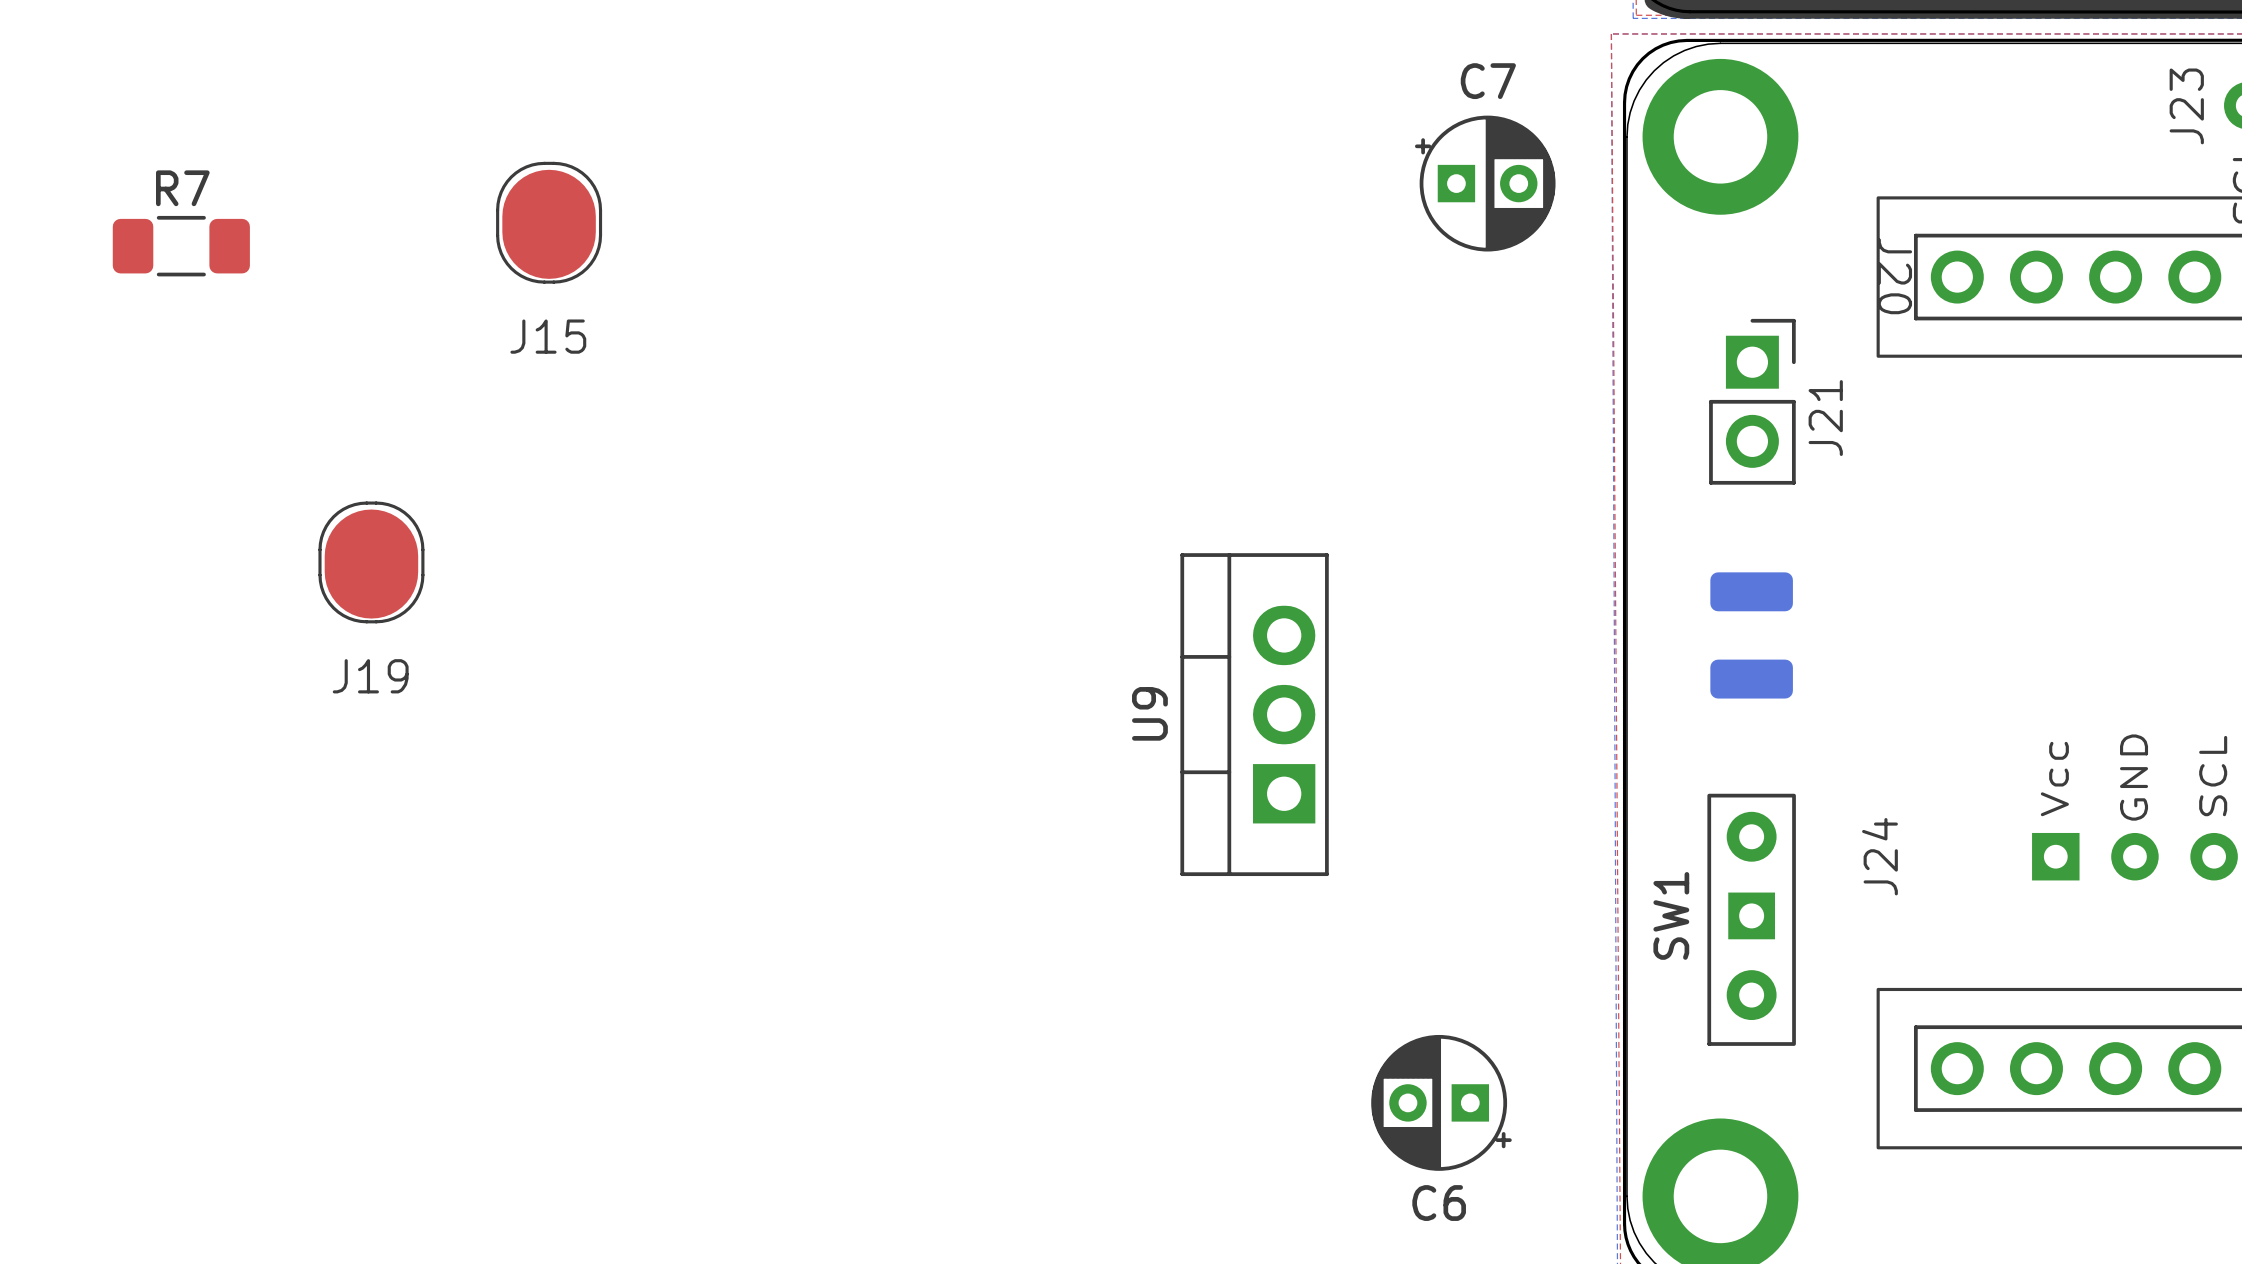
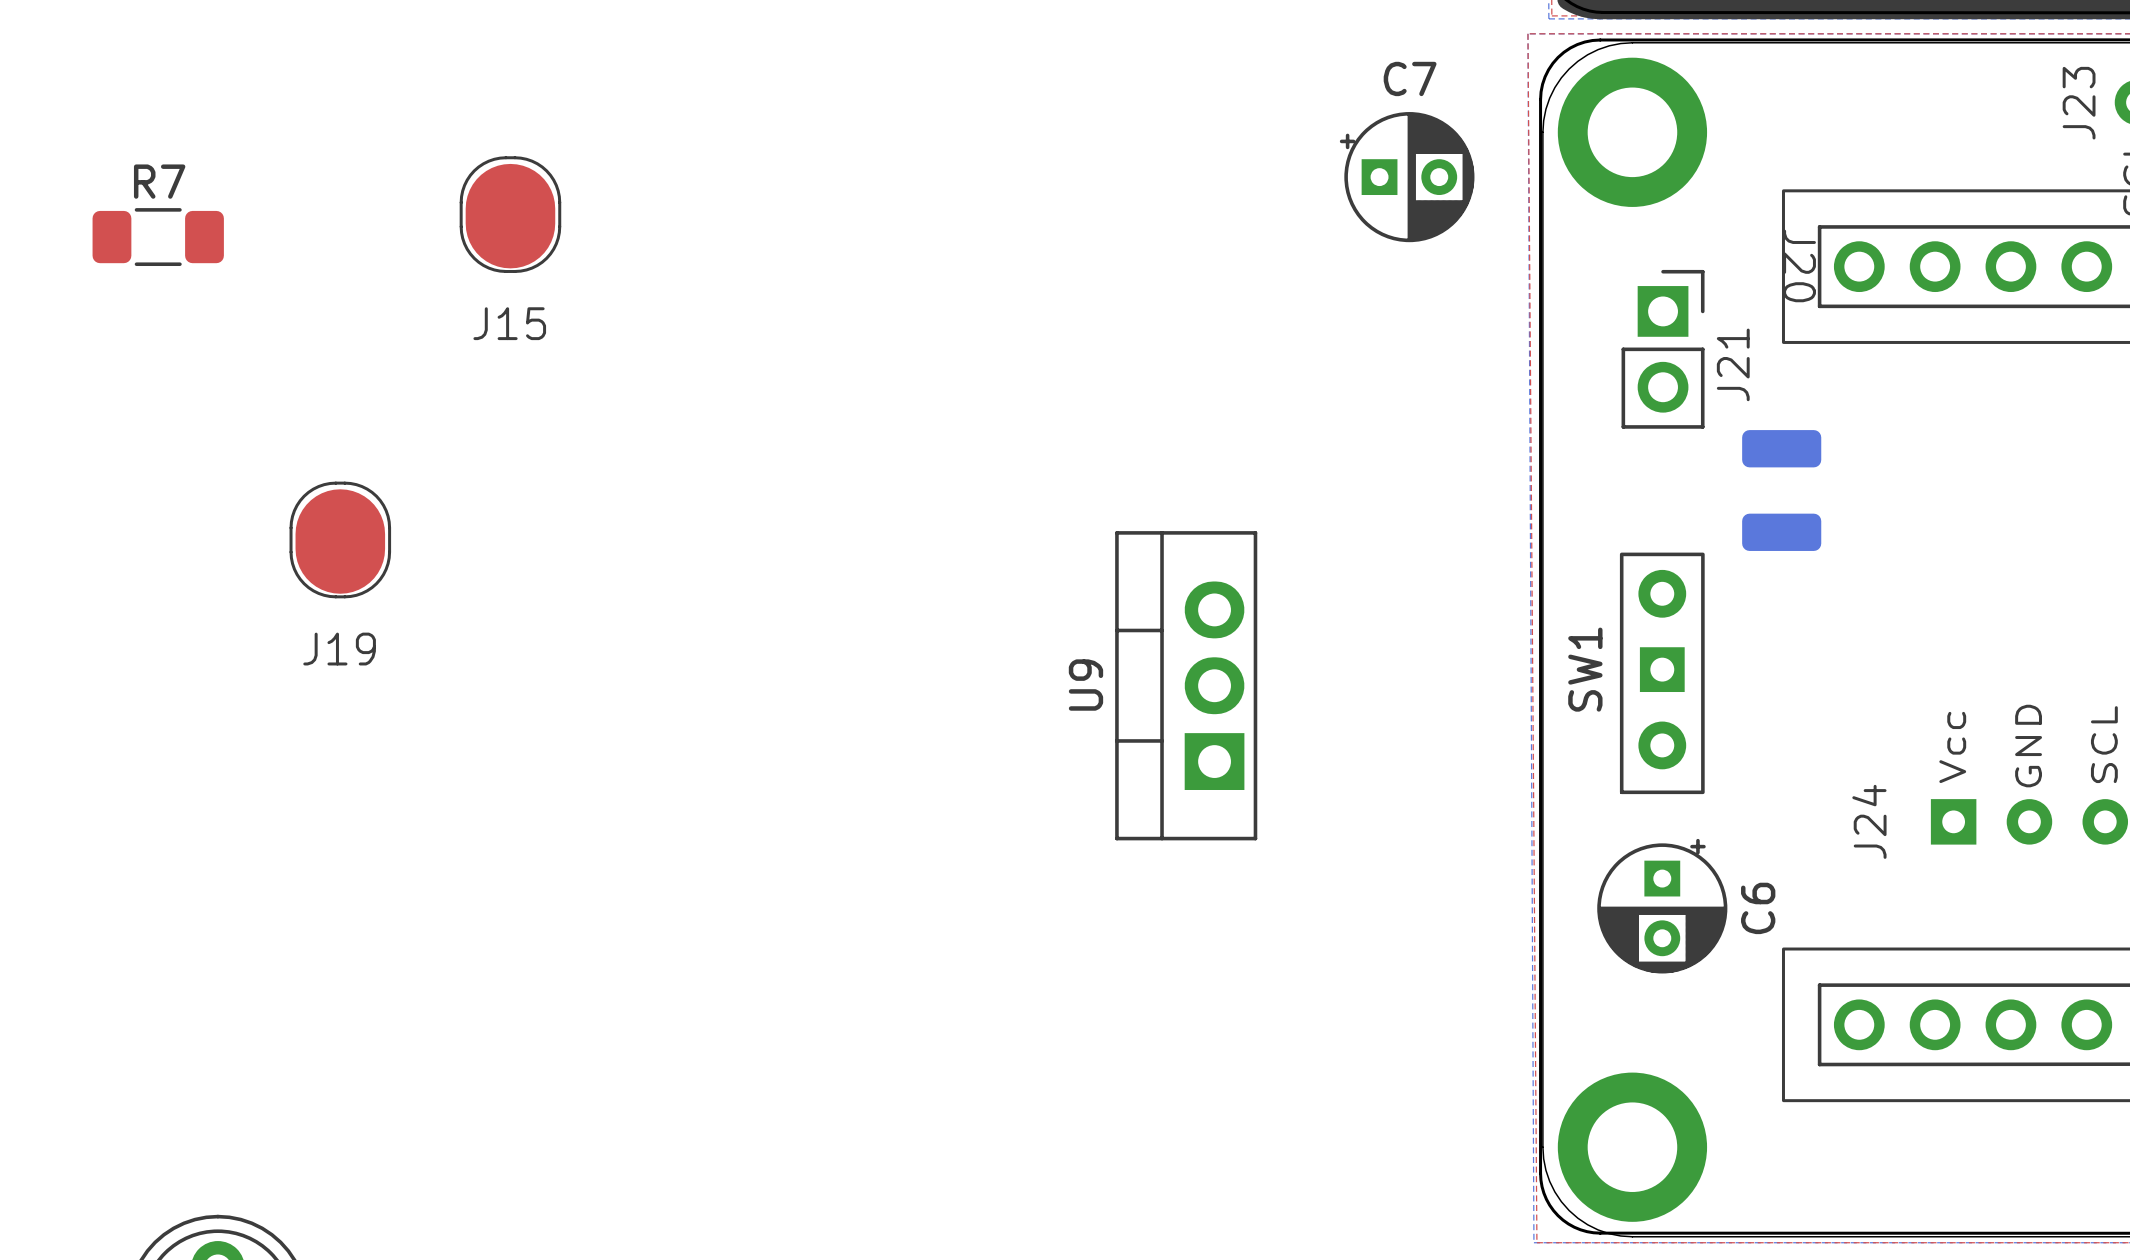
J21 position: (1752, 401) -> (1663, 349)
part position: (1751, 635) -> (1781, 490)
J24 name position: J24 (1879, 856) -> J24 (1869, 821)
SW1 position: (1751, 919) -> (1662, 673)
C6 rotation: 0° (1441, 1102) -> 90° counterclockwise (1662, 906)
C6 position: (1441, 1102) -> (1662, 906)

